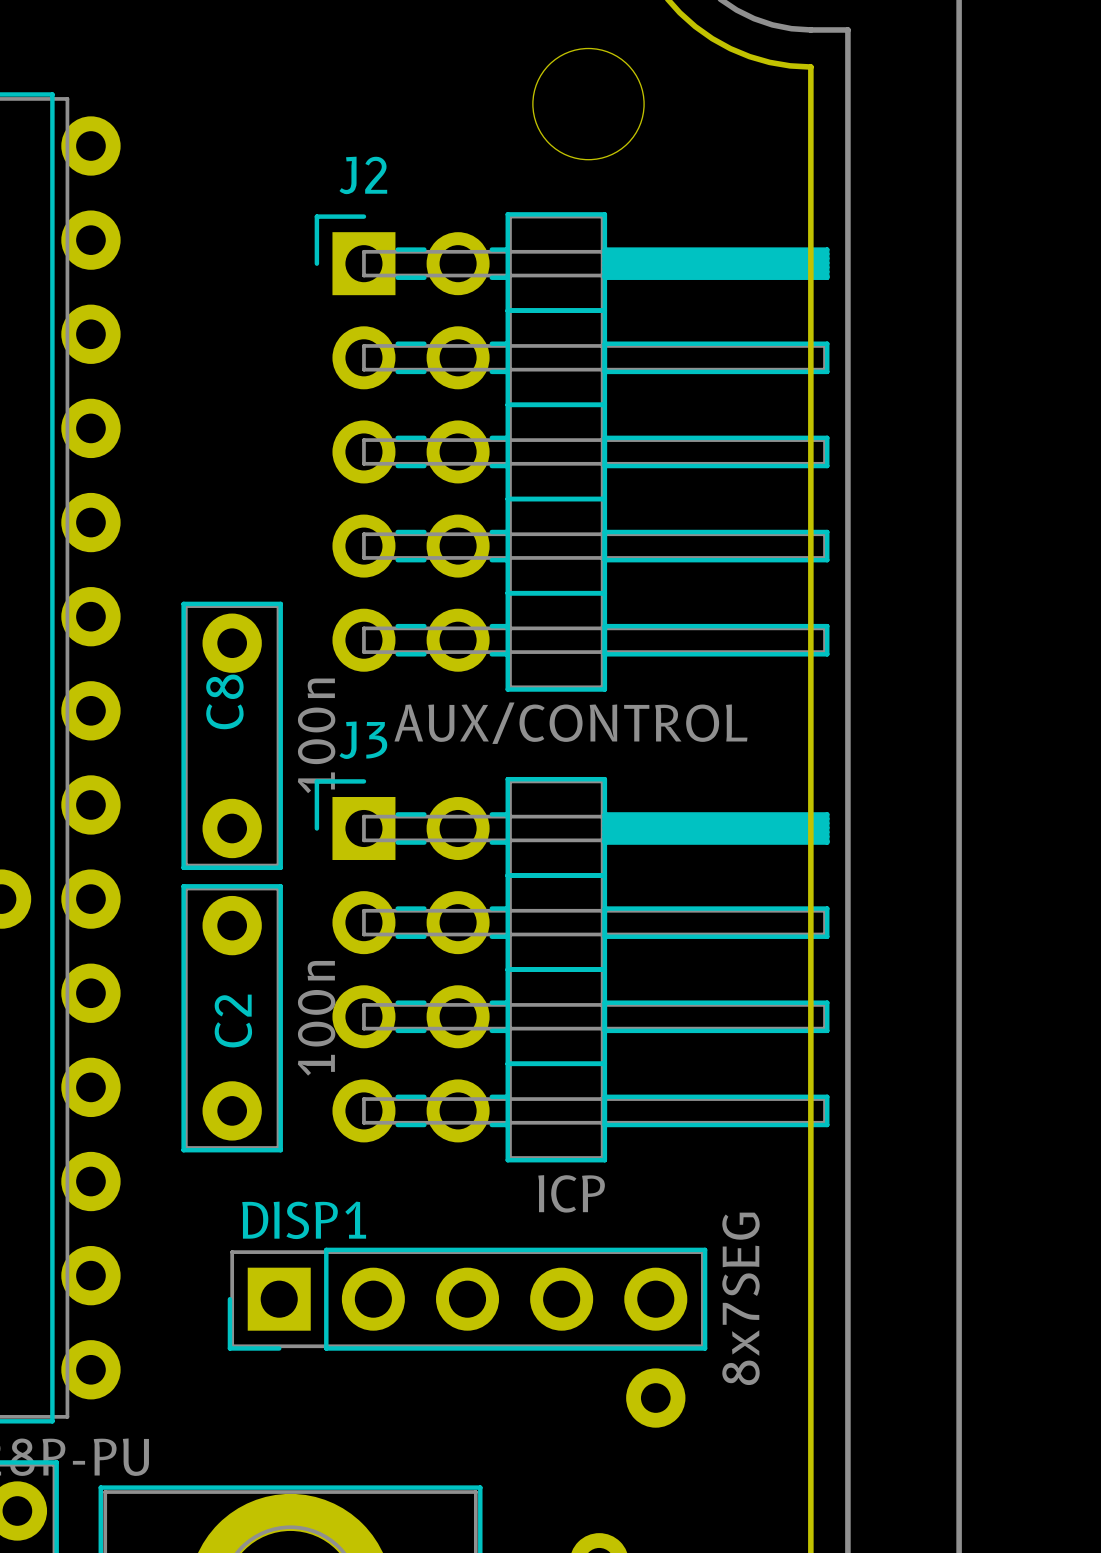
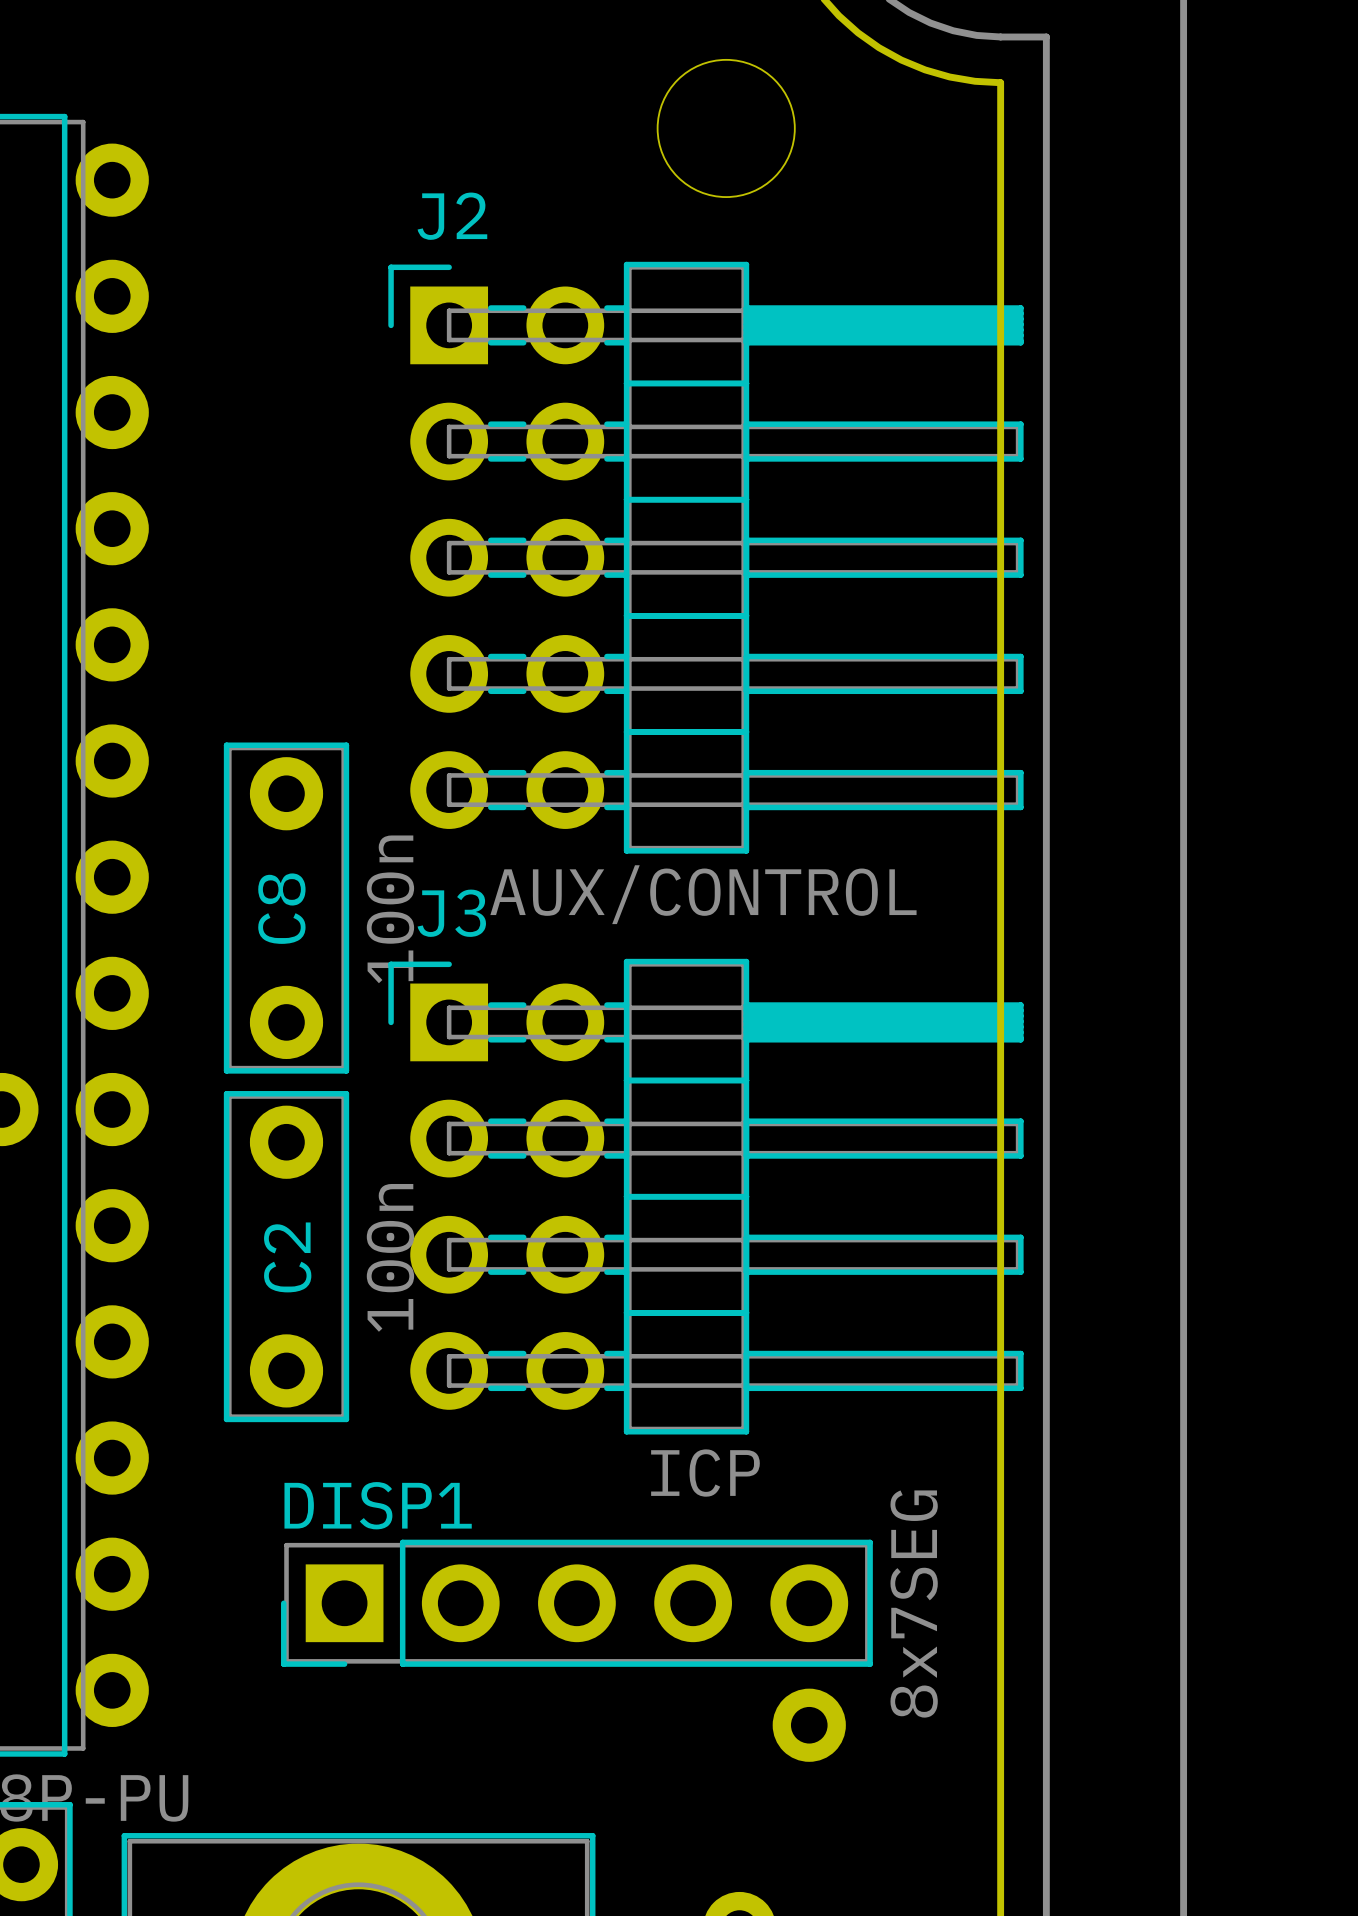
C8 name position: C8 (224, 701) -> C8 (281, 908)

